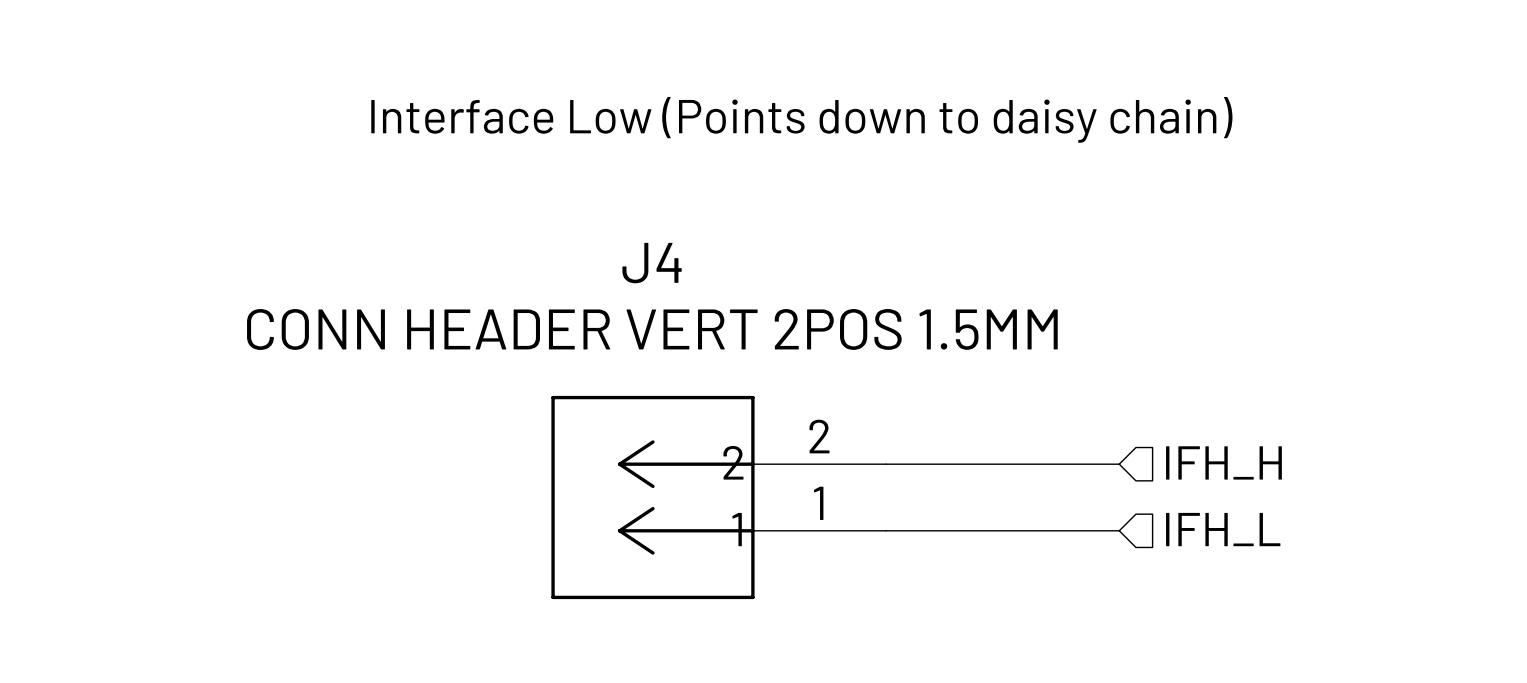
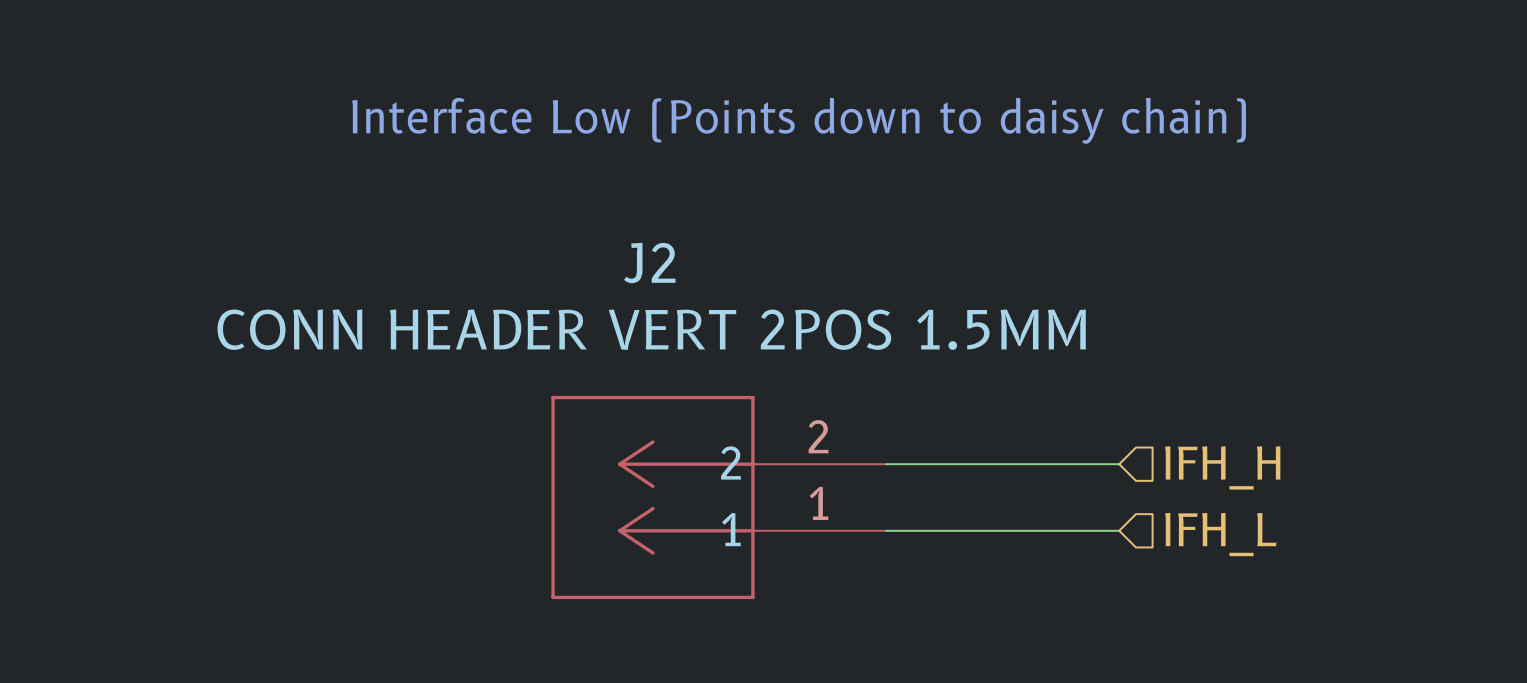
J4 name: J4 (652, 263) -> J2 (649, 263)

